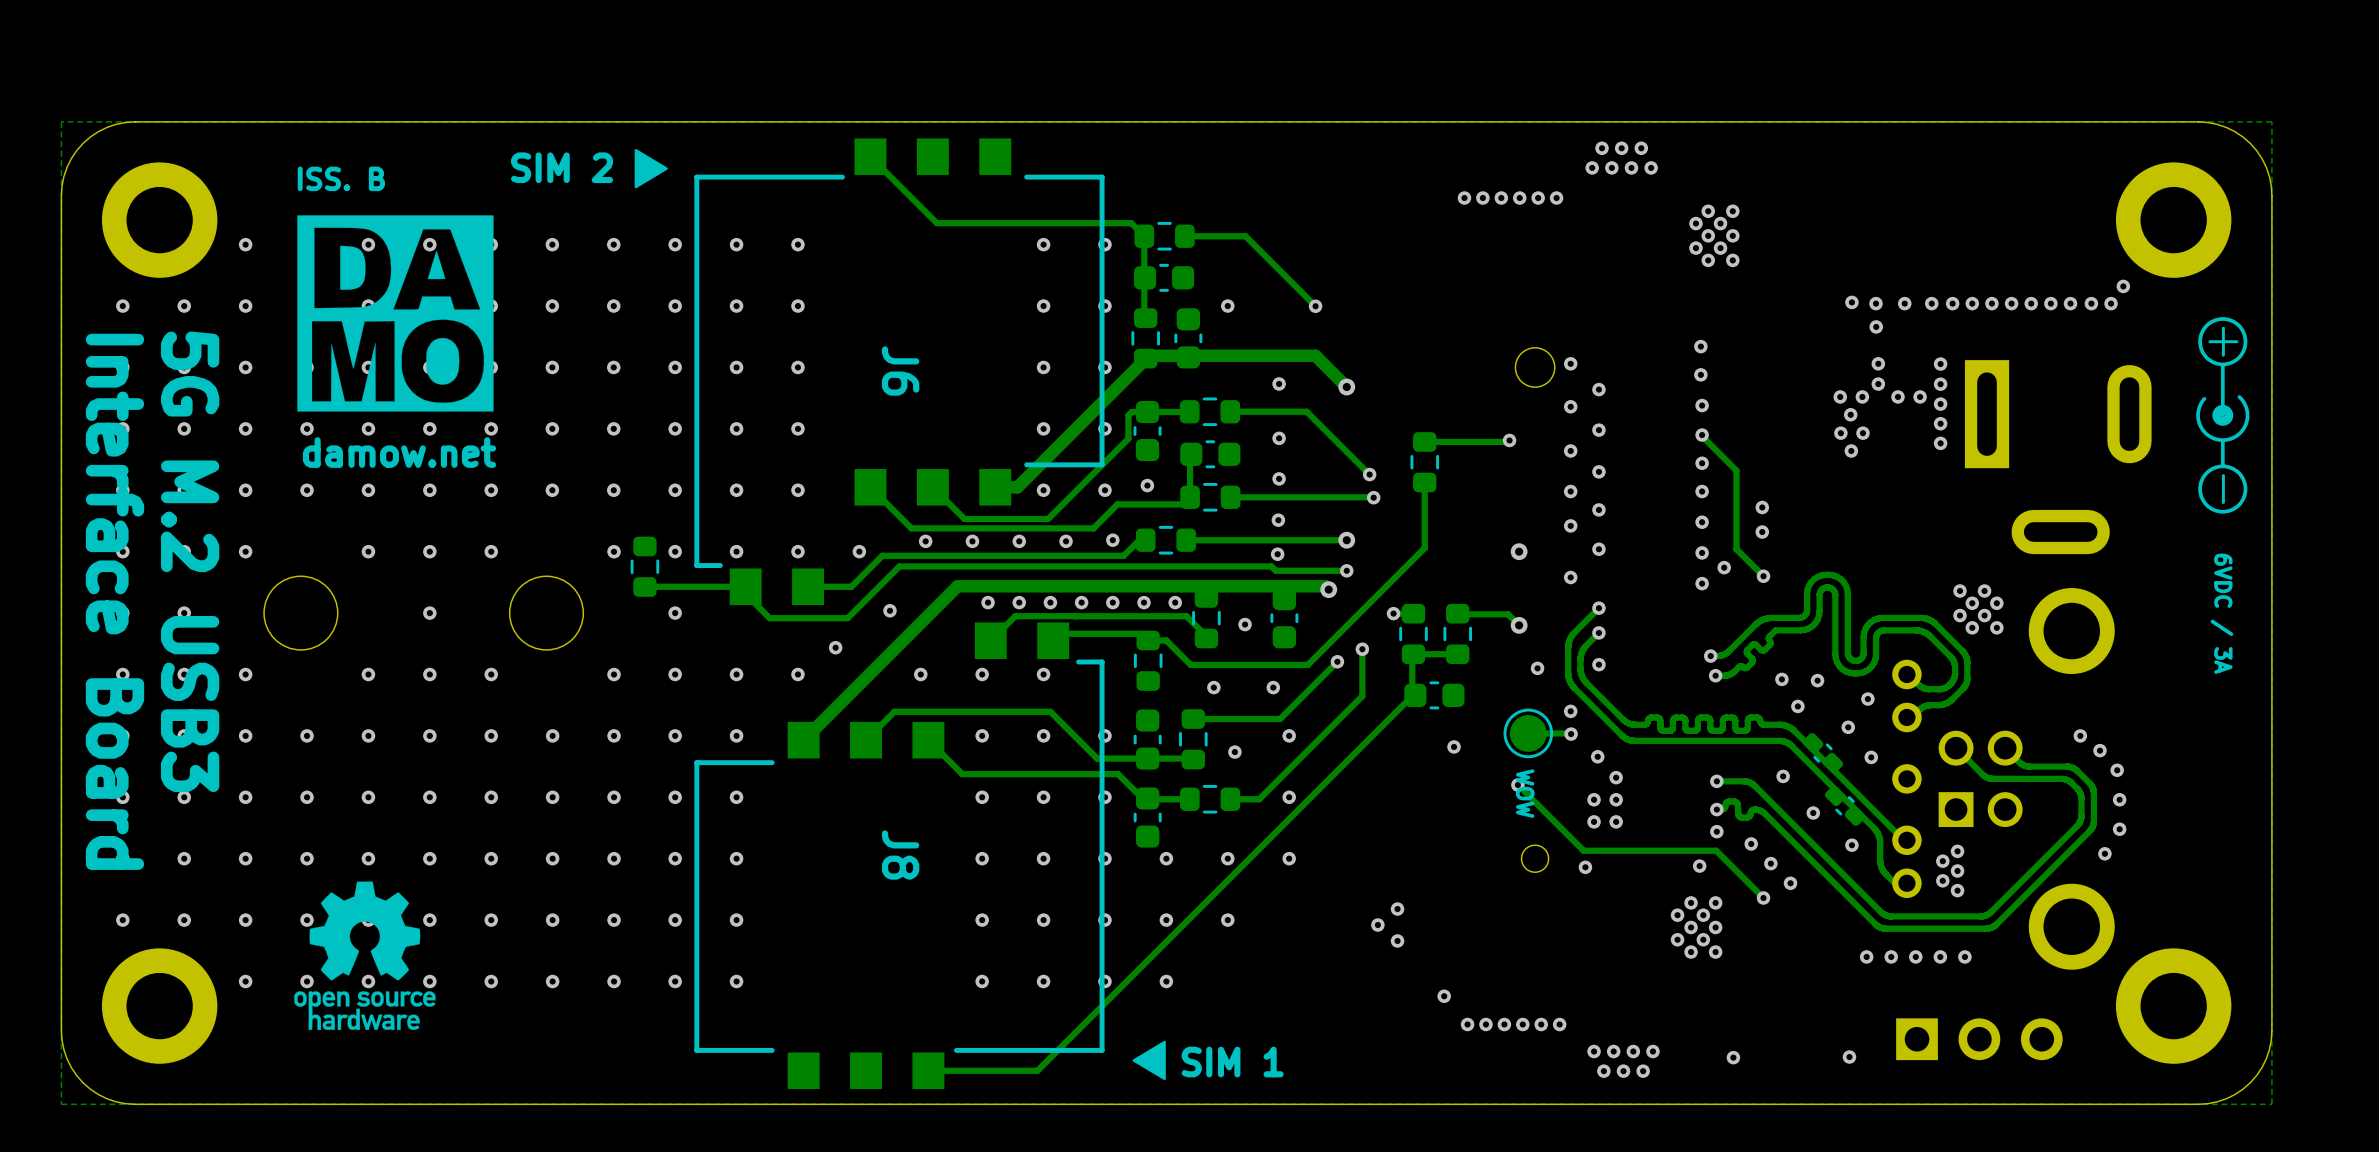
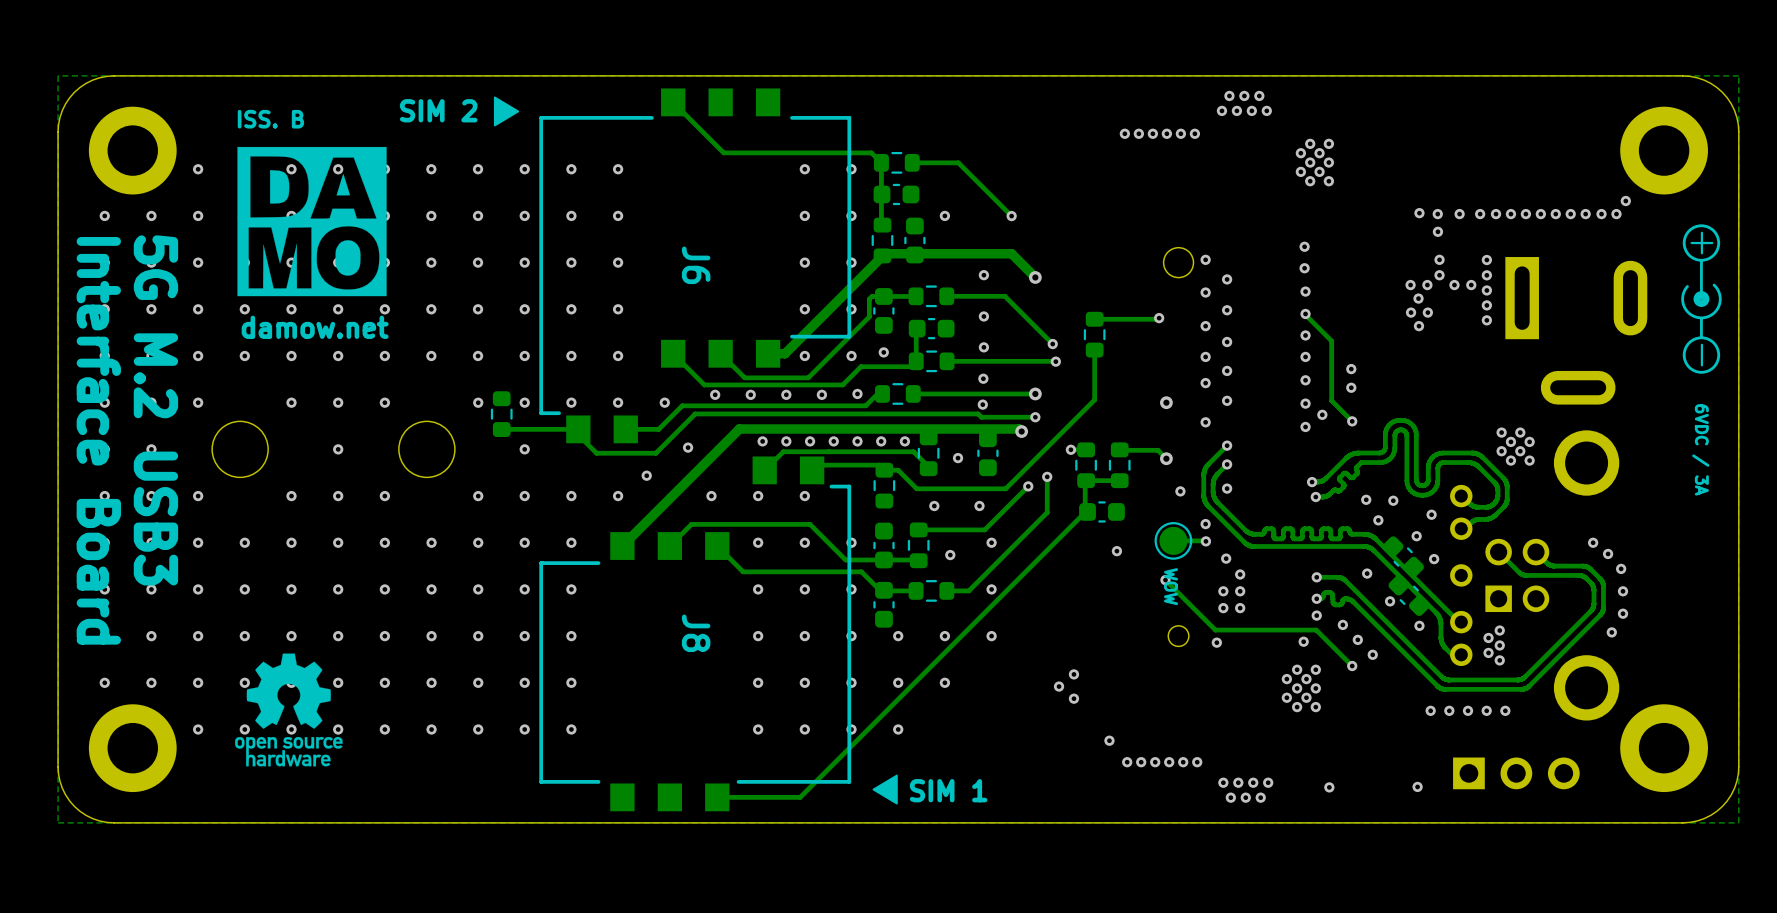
part footprint: [1802, 733, 1844, 774] -> [1382, 536, 1424, 578]
part footprint: [1824, 785, 1866, 826] -> [1388, 574, 1430, 616]

